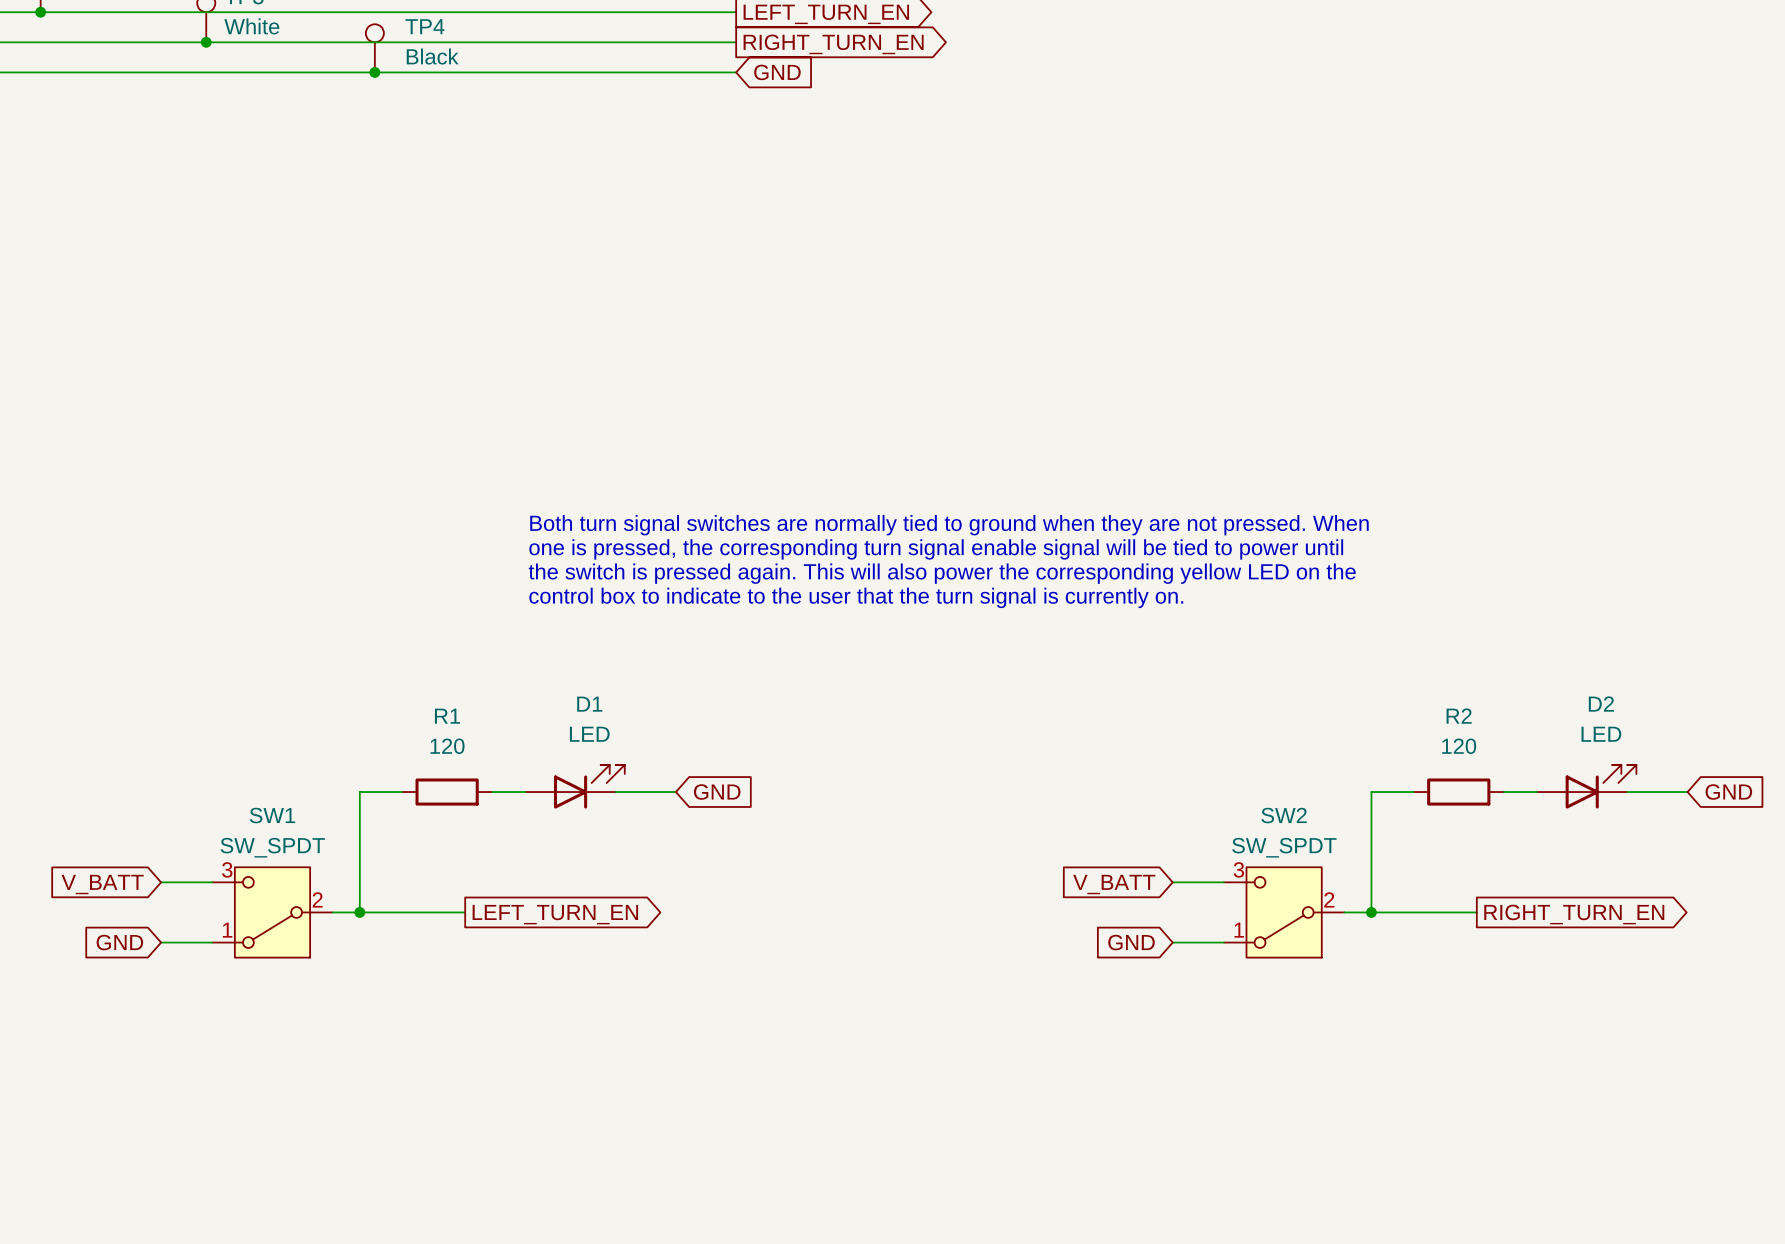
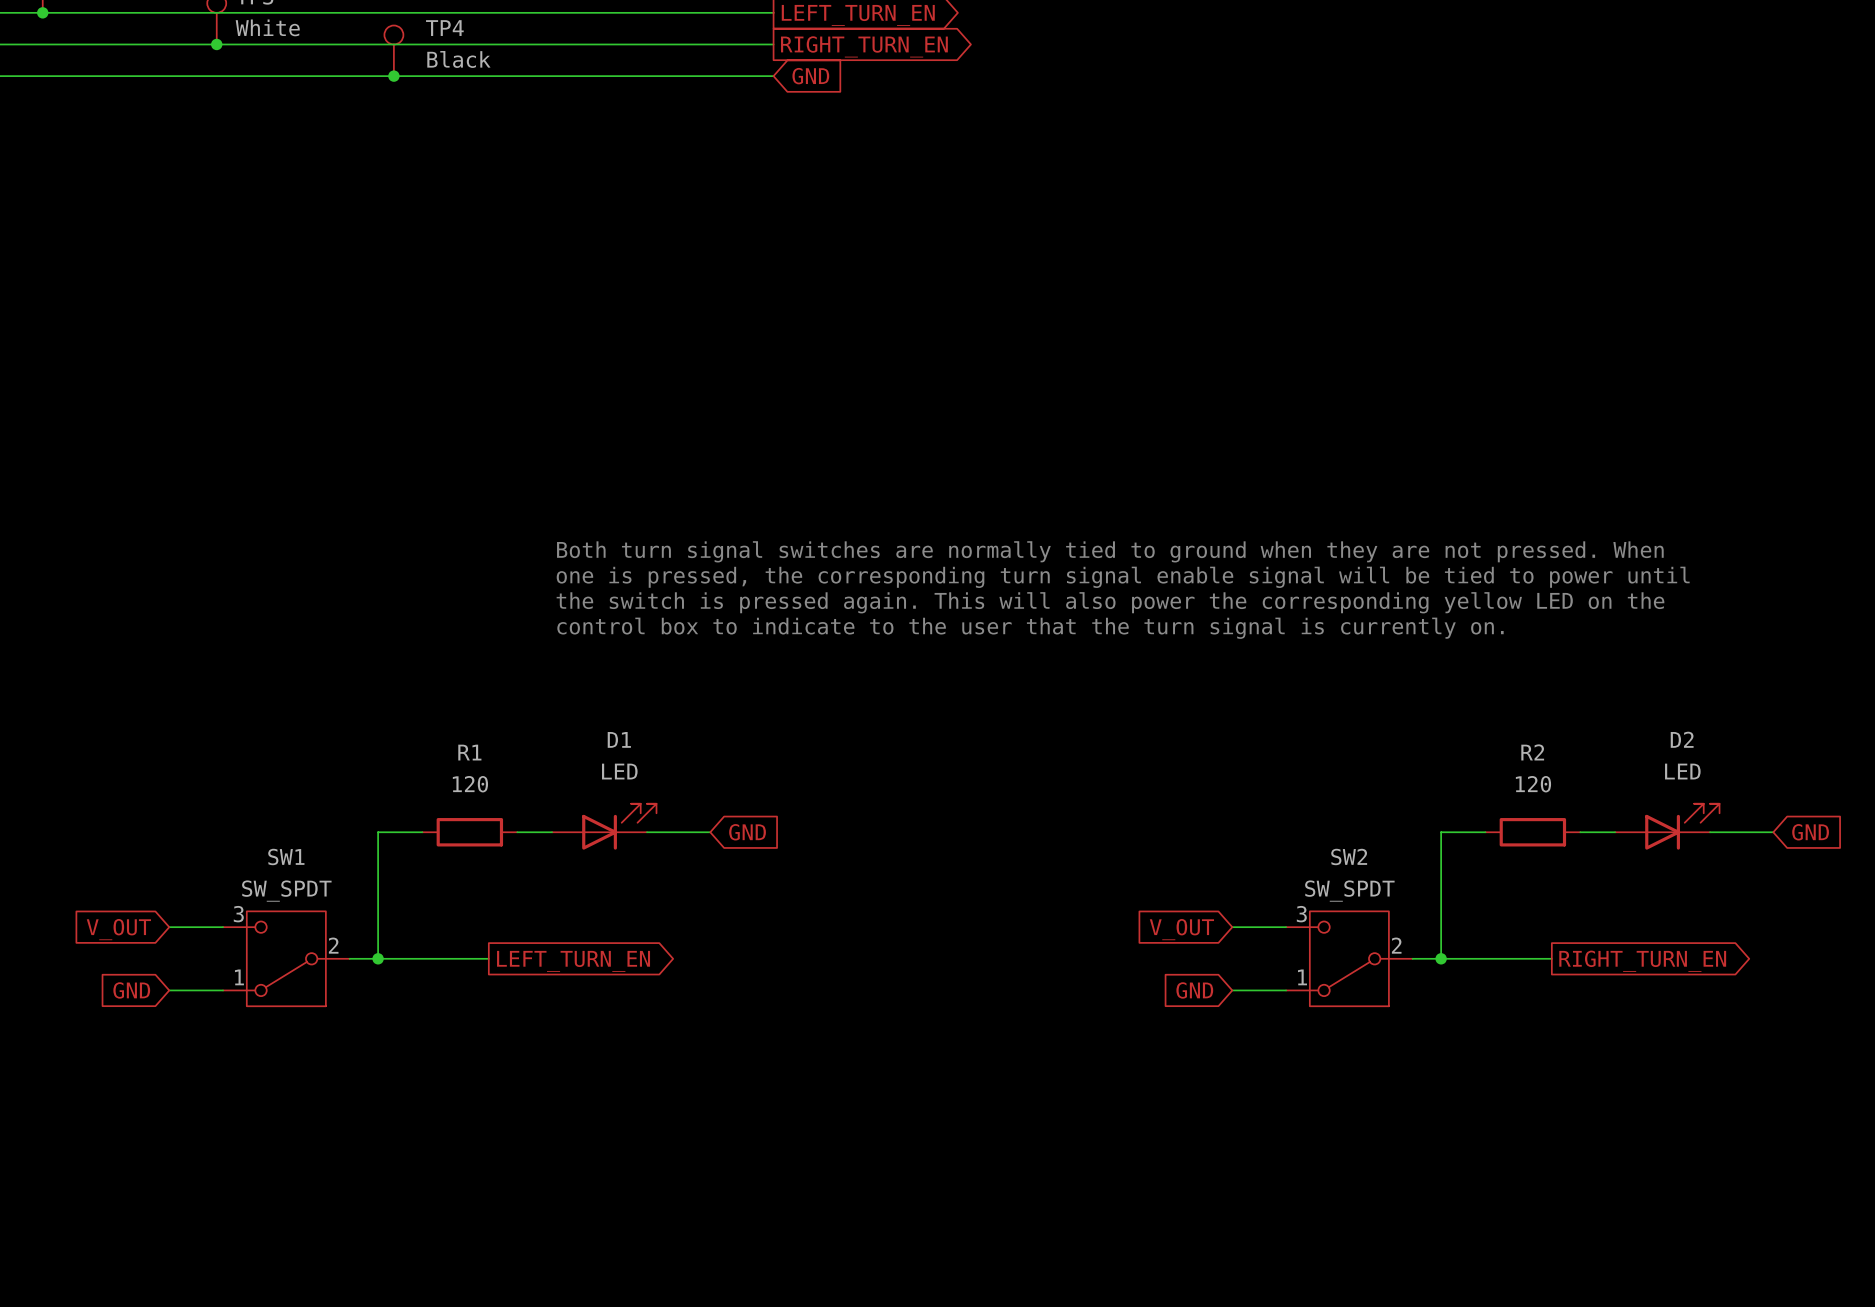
global label: V_BATT (102, 884) -> V_OUT (118, 929)
global label: V_BATT (1114, 884) -> V_OUT (1181, 929)

